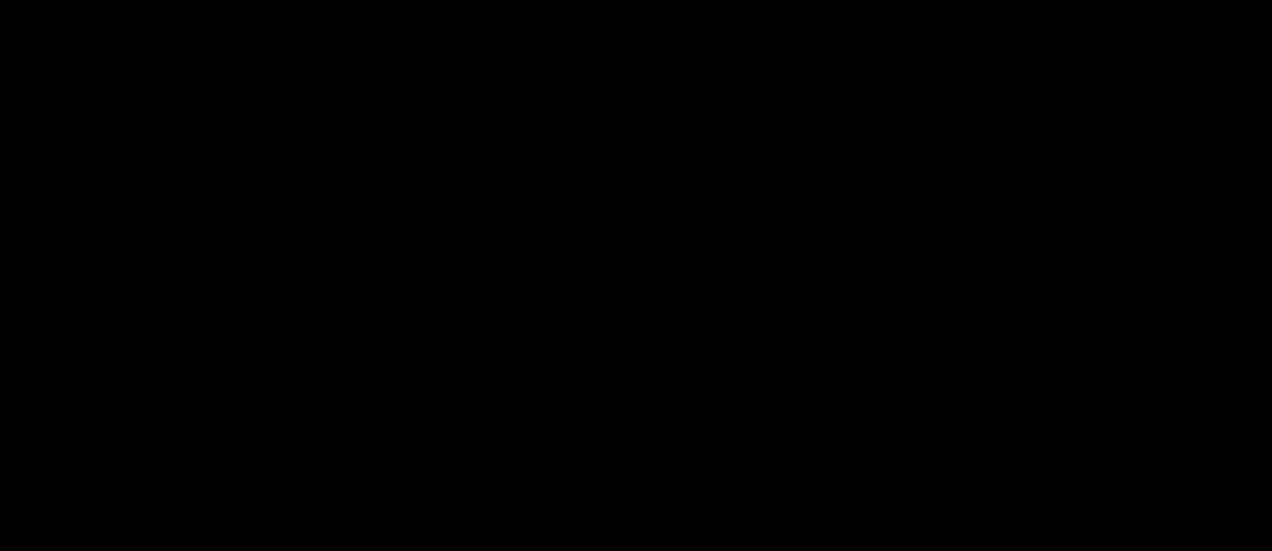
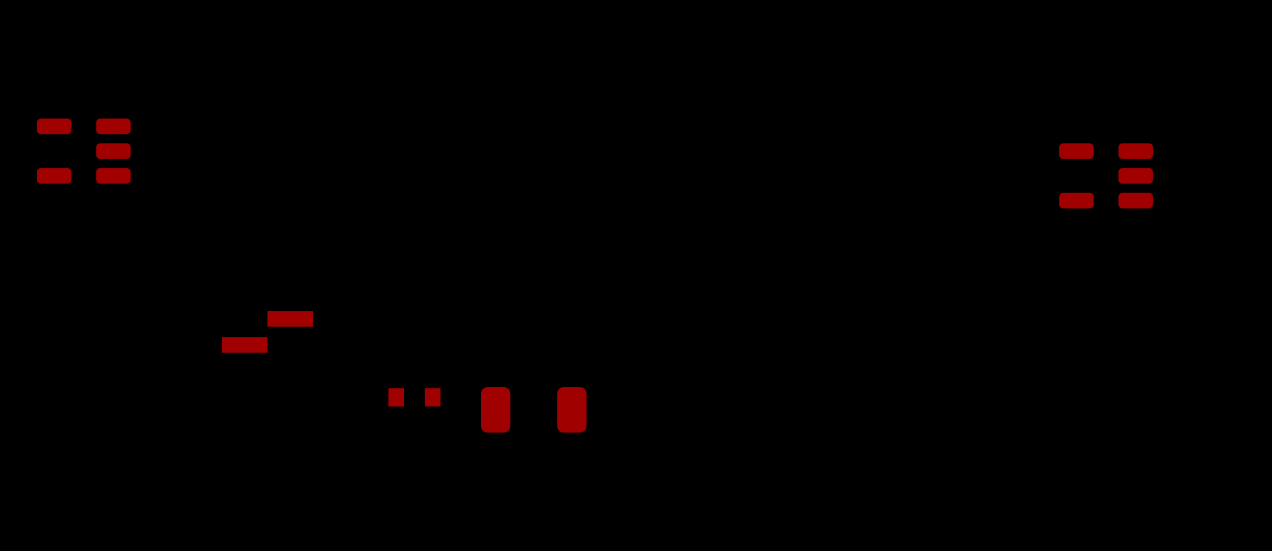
part: none -> (83, 151)
part: none -> (1106, 175)
part: none -> (267, 331)
part: none -> (414, 397)
part: none -> (533, 409)

